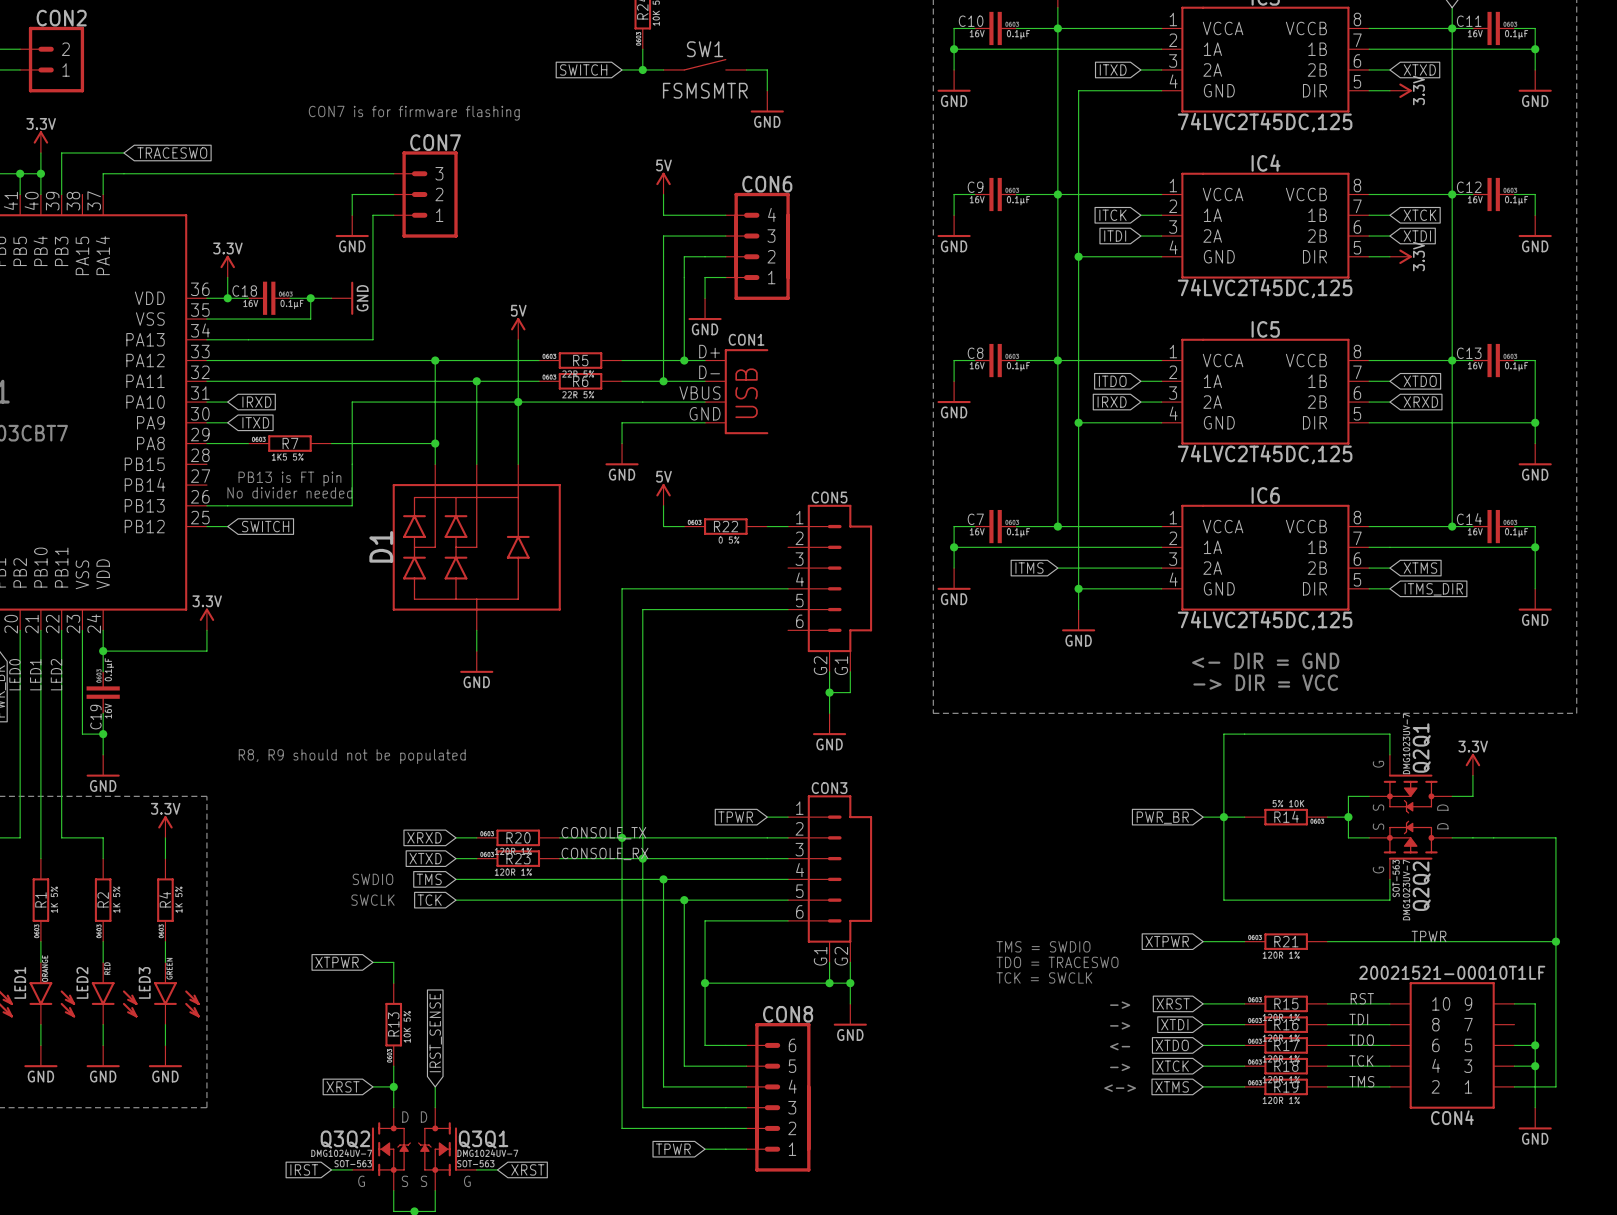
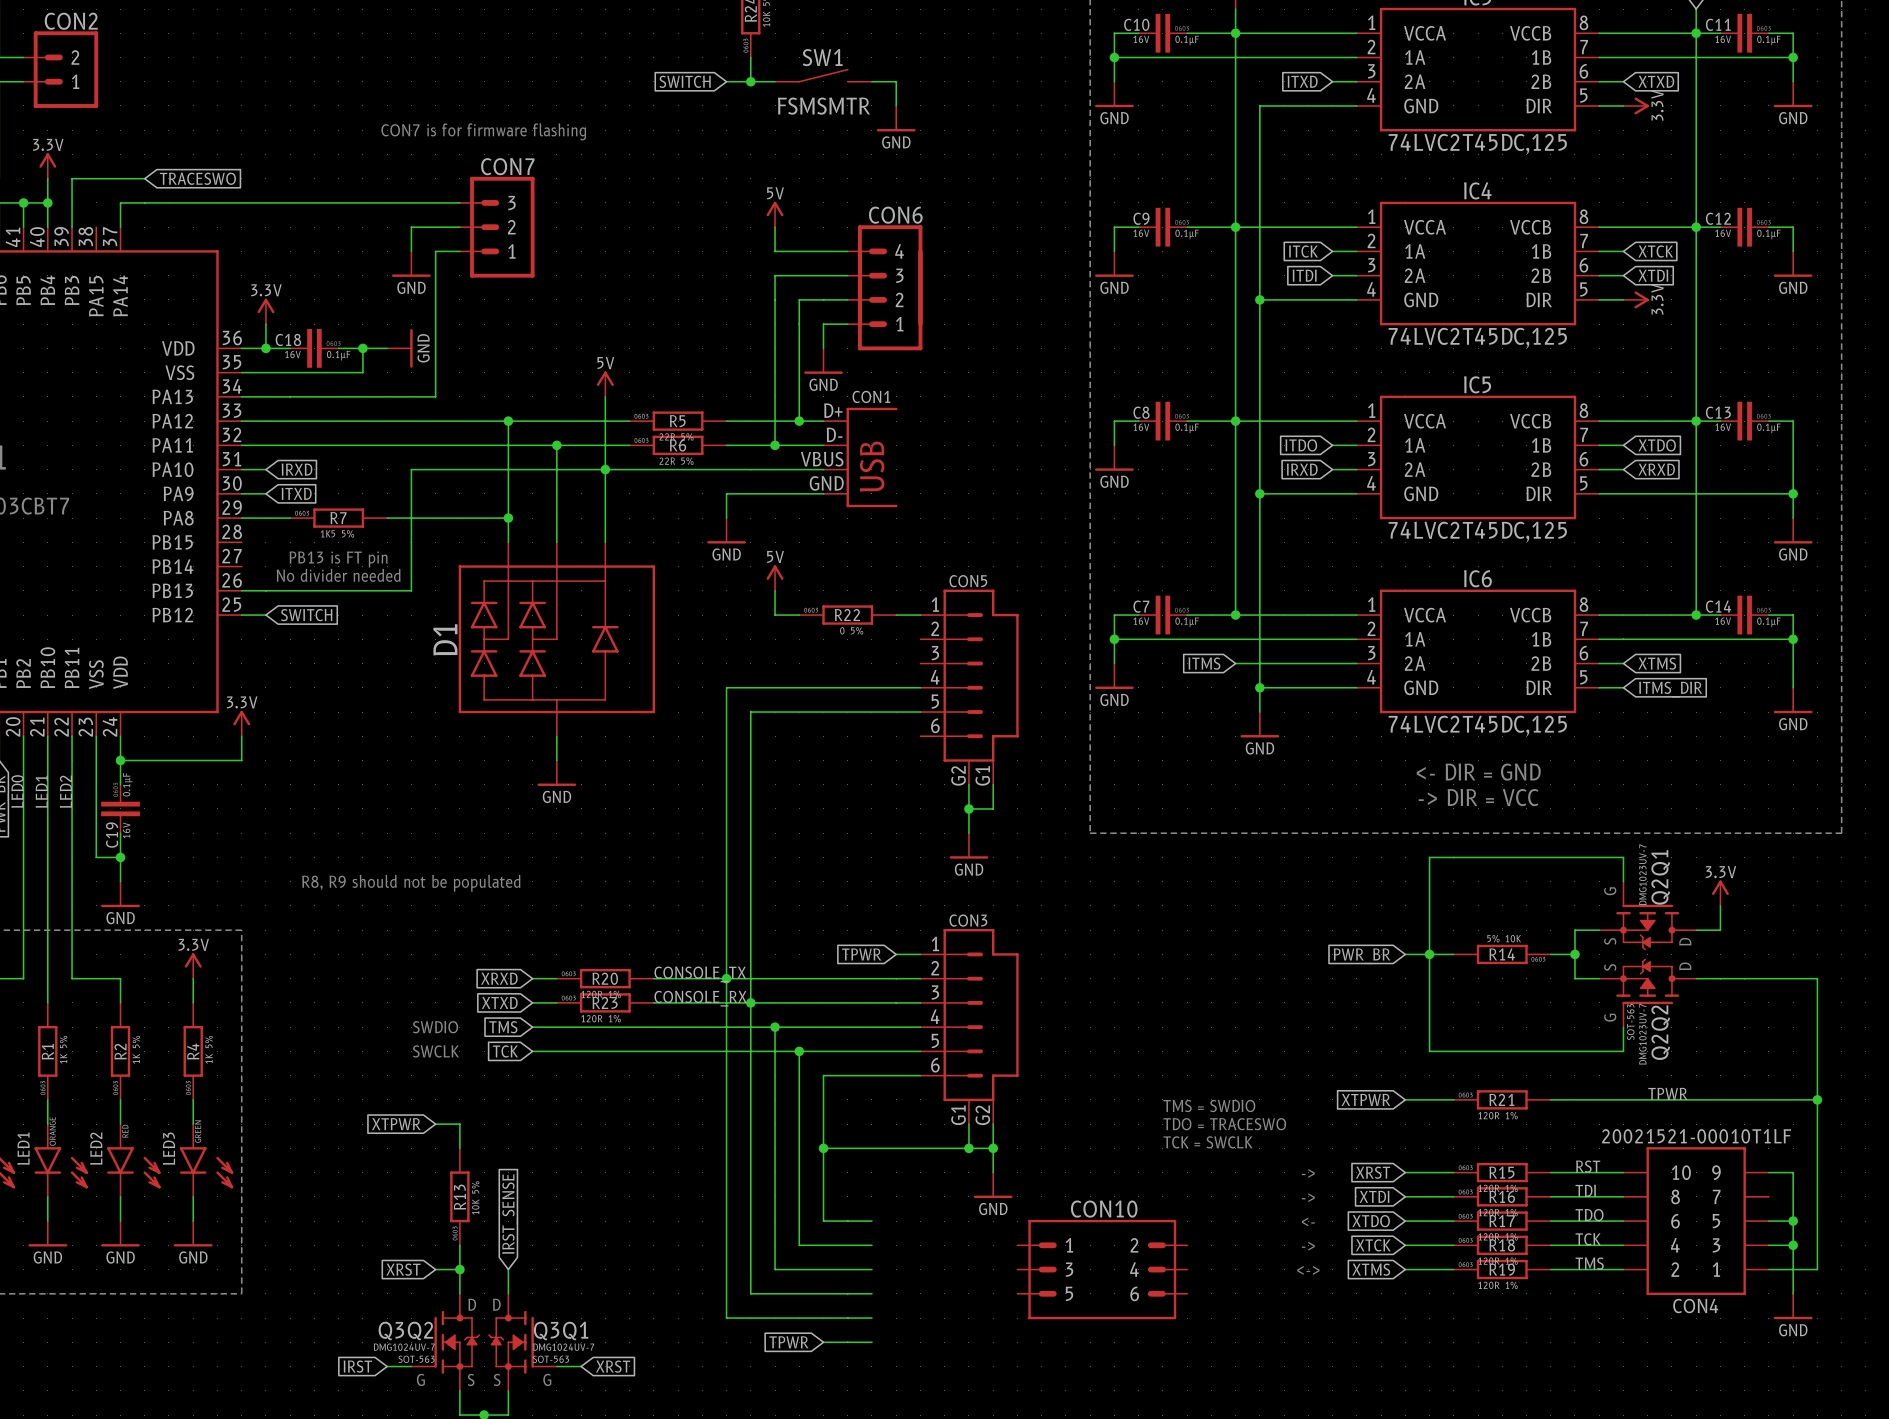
CON10: none -> (1102, 1269)
CON8: (778, 1097) -> none

